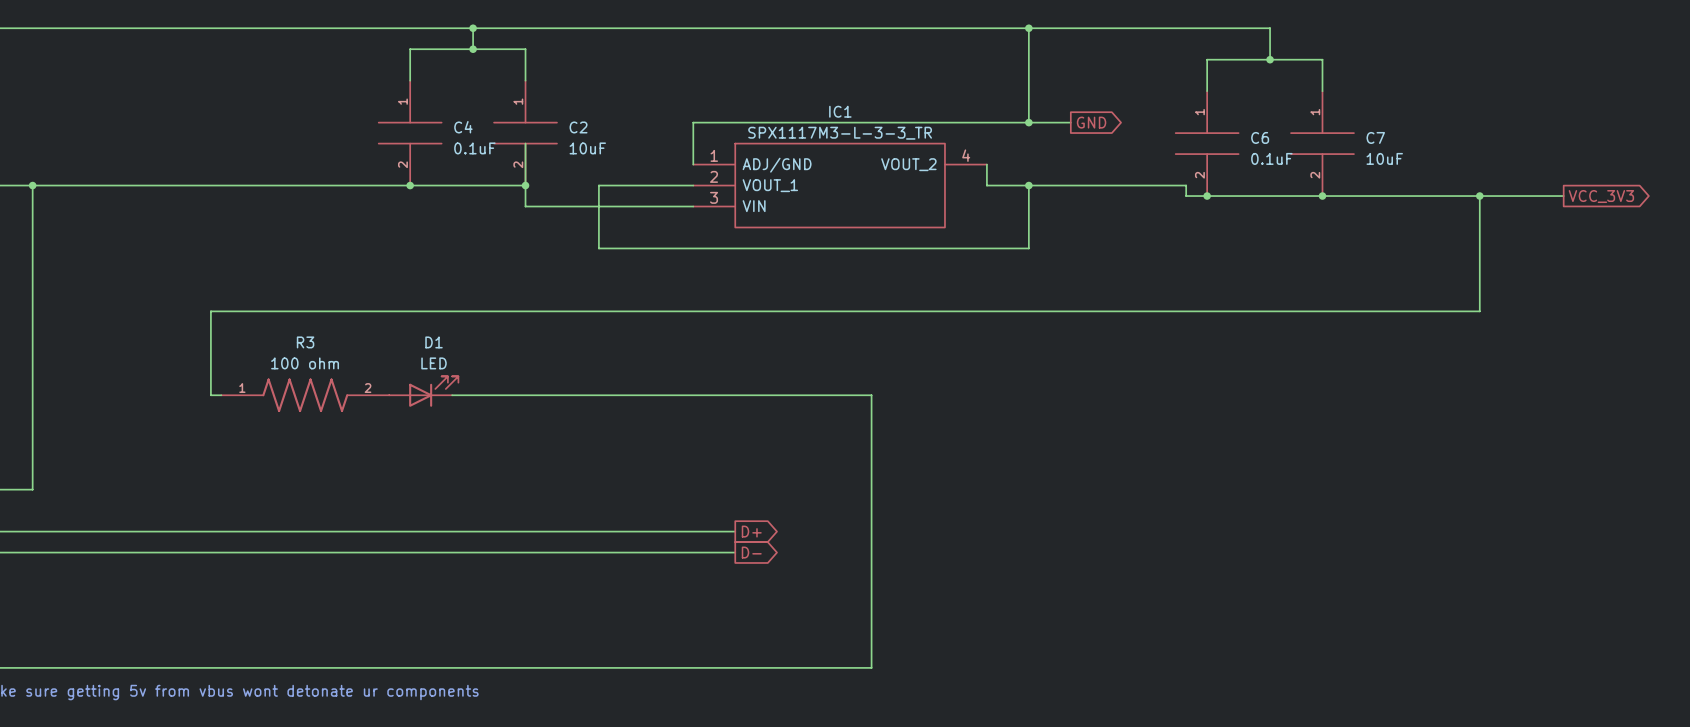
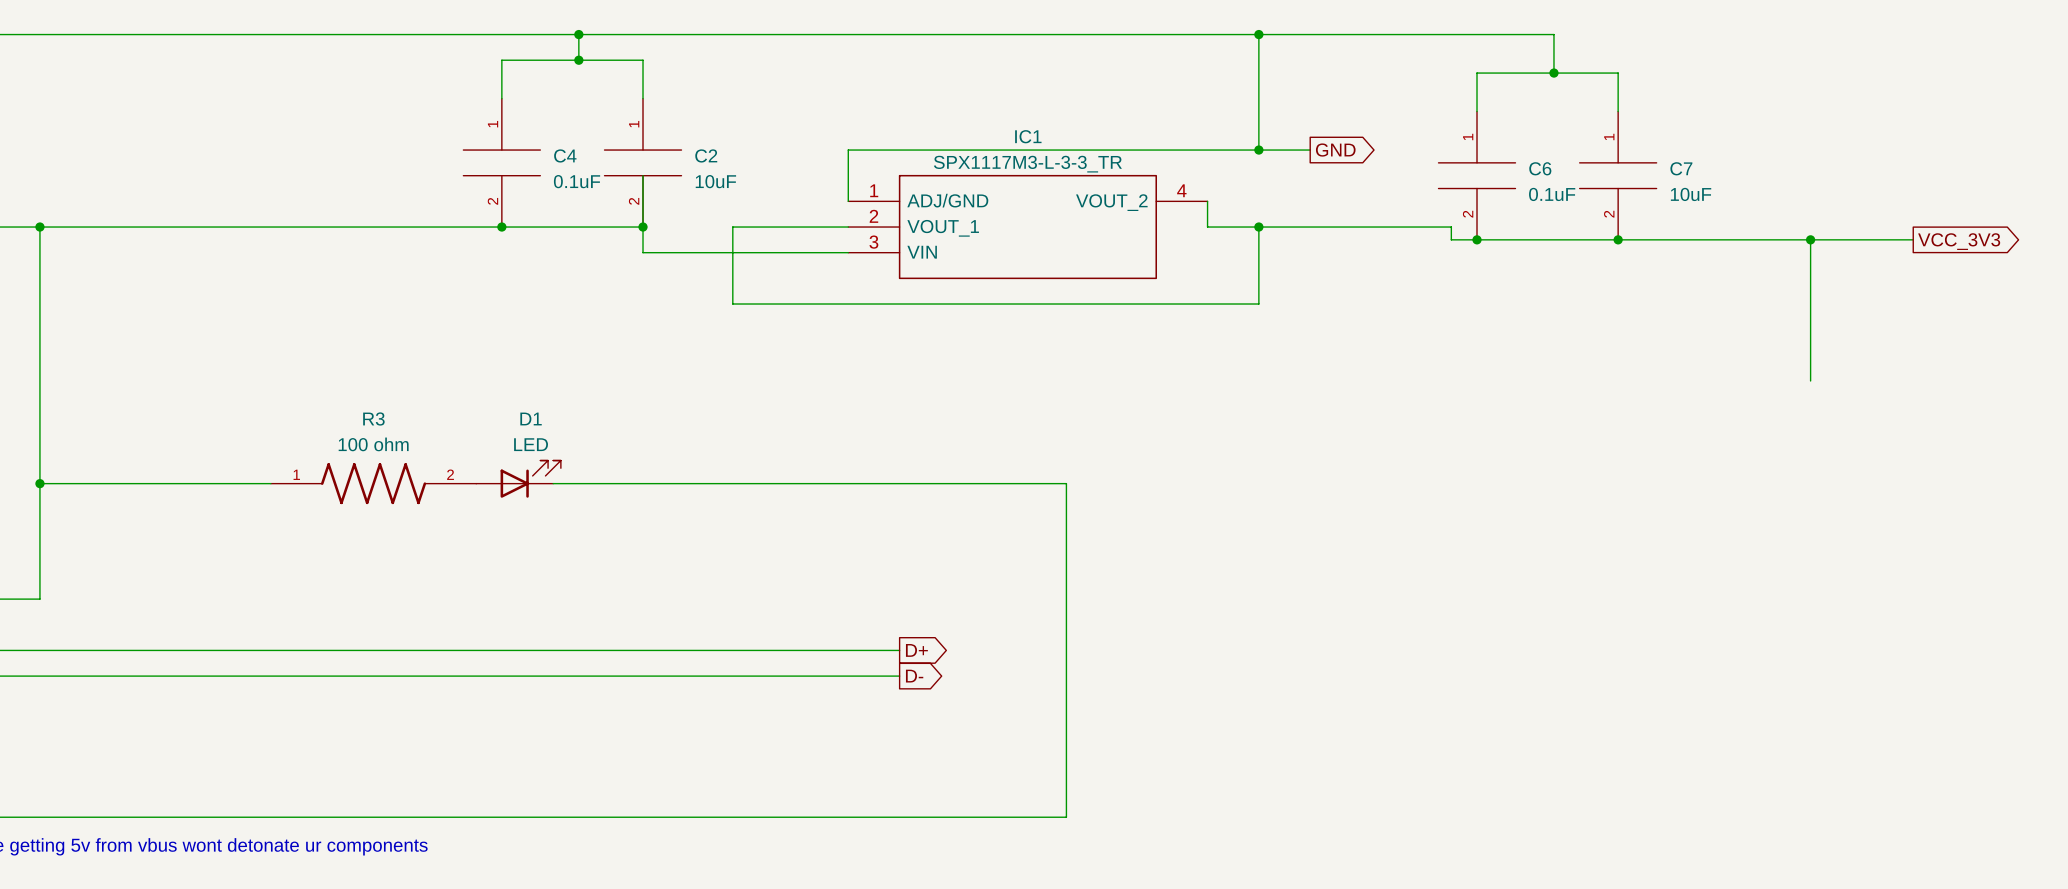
wire: (1479, 311) (210, 311) (210, 395) -> (39, 483) (258, 483)
junction: none -> (39, 483)

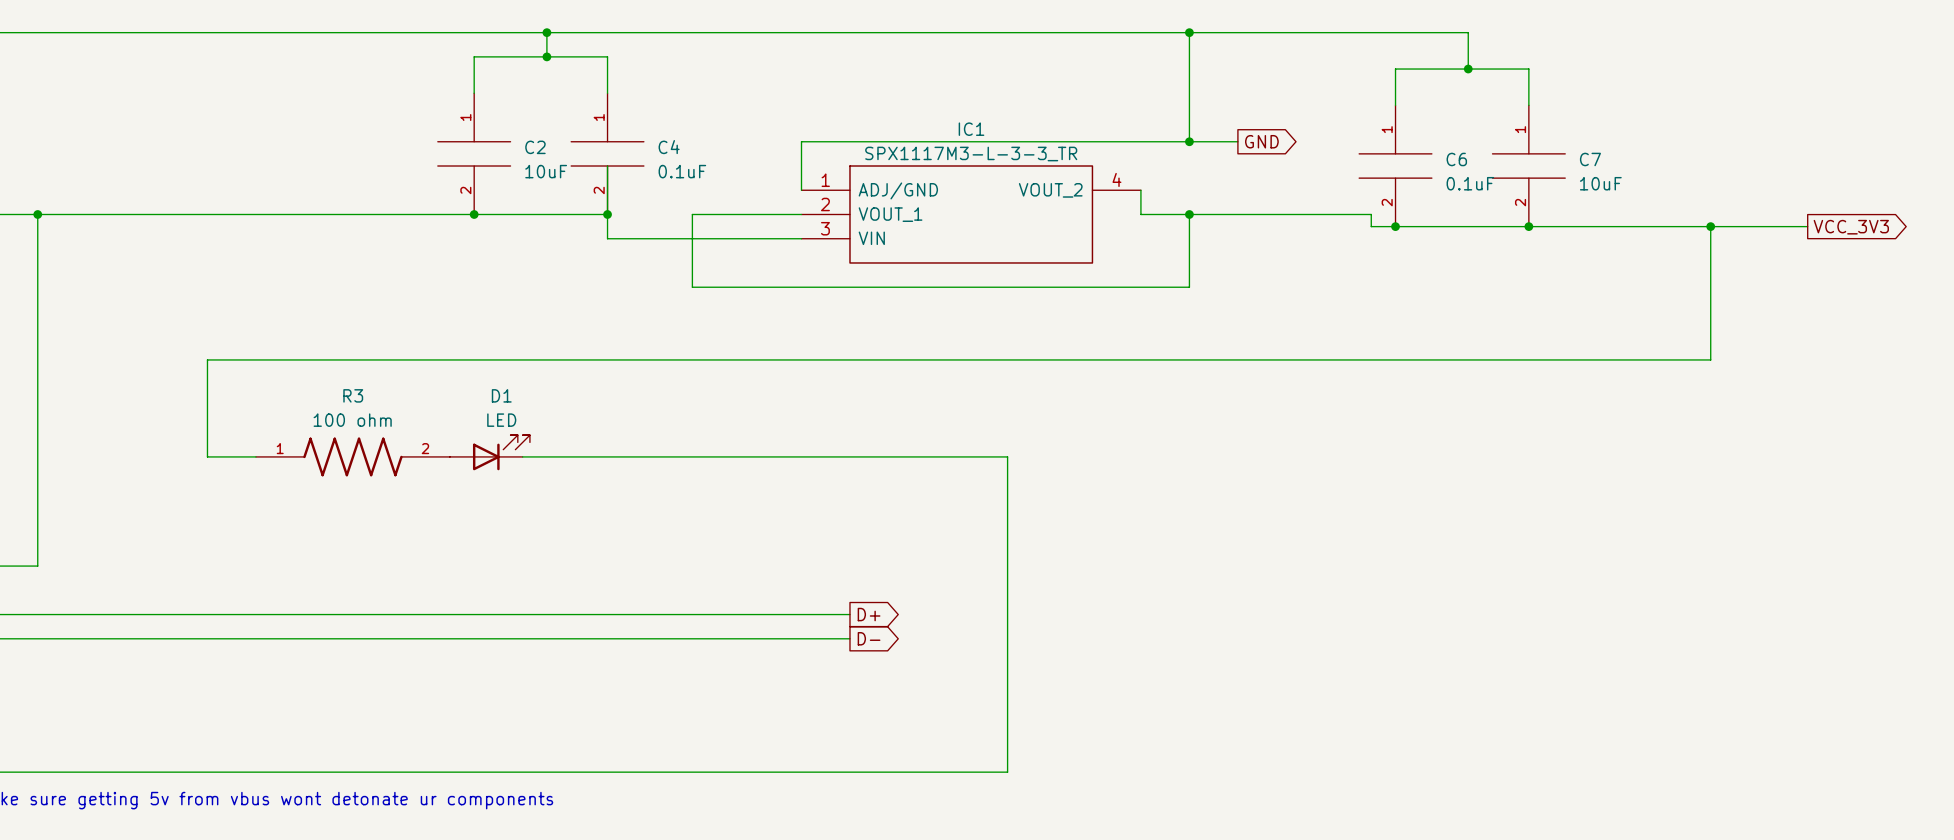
C4 name: C4 (565, 155) -> C2 (535, 147)
C2 name: C2 (706, 155) -> C4 (669, 147)
C4 value: 0.1uF (577, 181) -> 10uF (546, 171)
C2 value: 10uF (715, 181) -> 0.1uF (682, 171)
wire: (39, 483) (219, 483) -> (1710, 359) (207, 359) (207, 456)
junction: (39, 483) -> none

